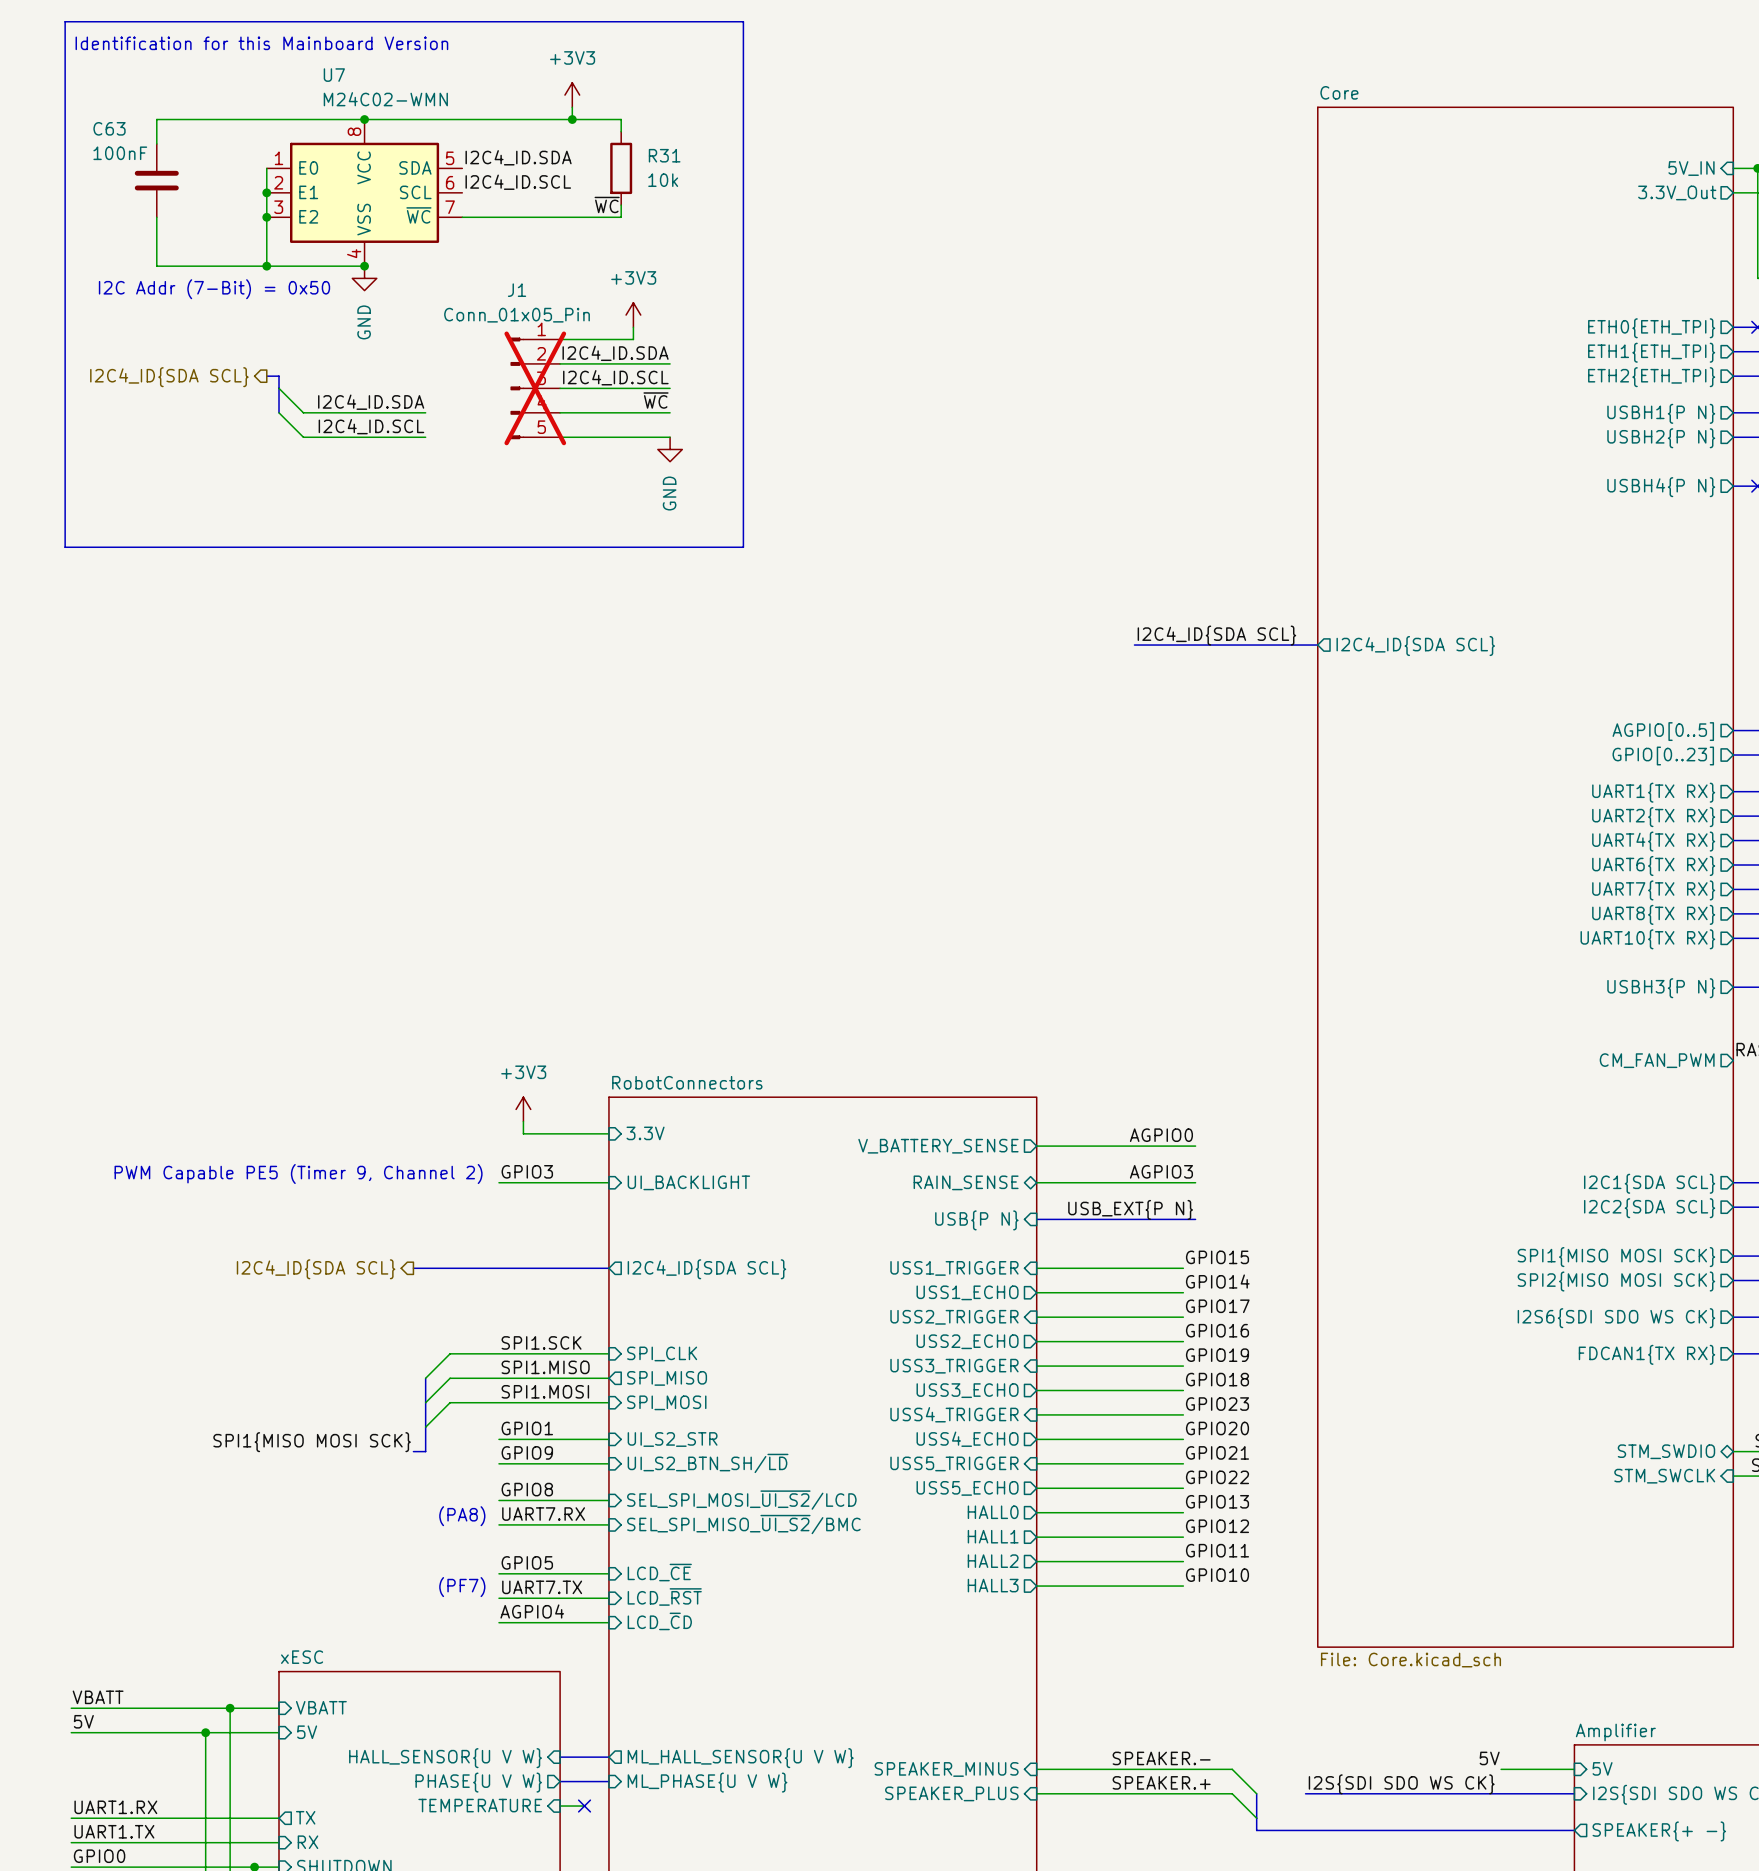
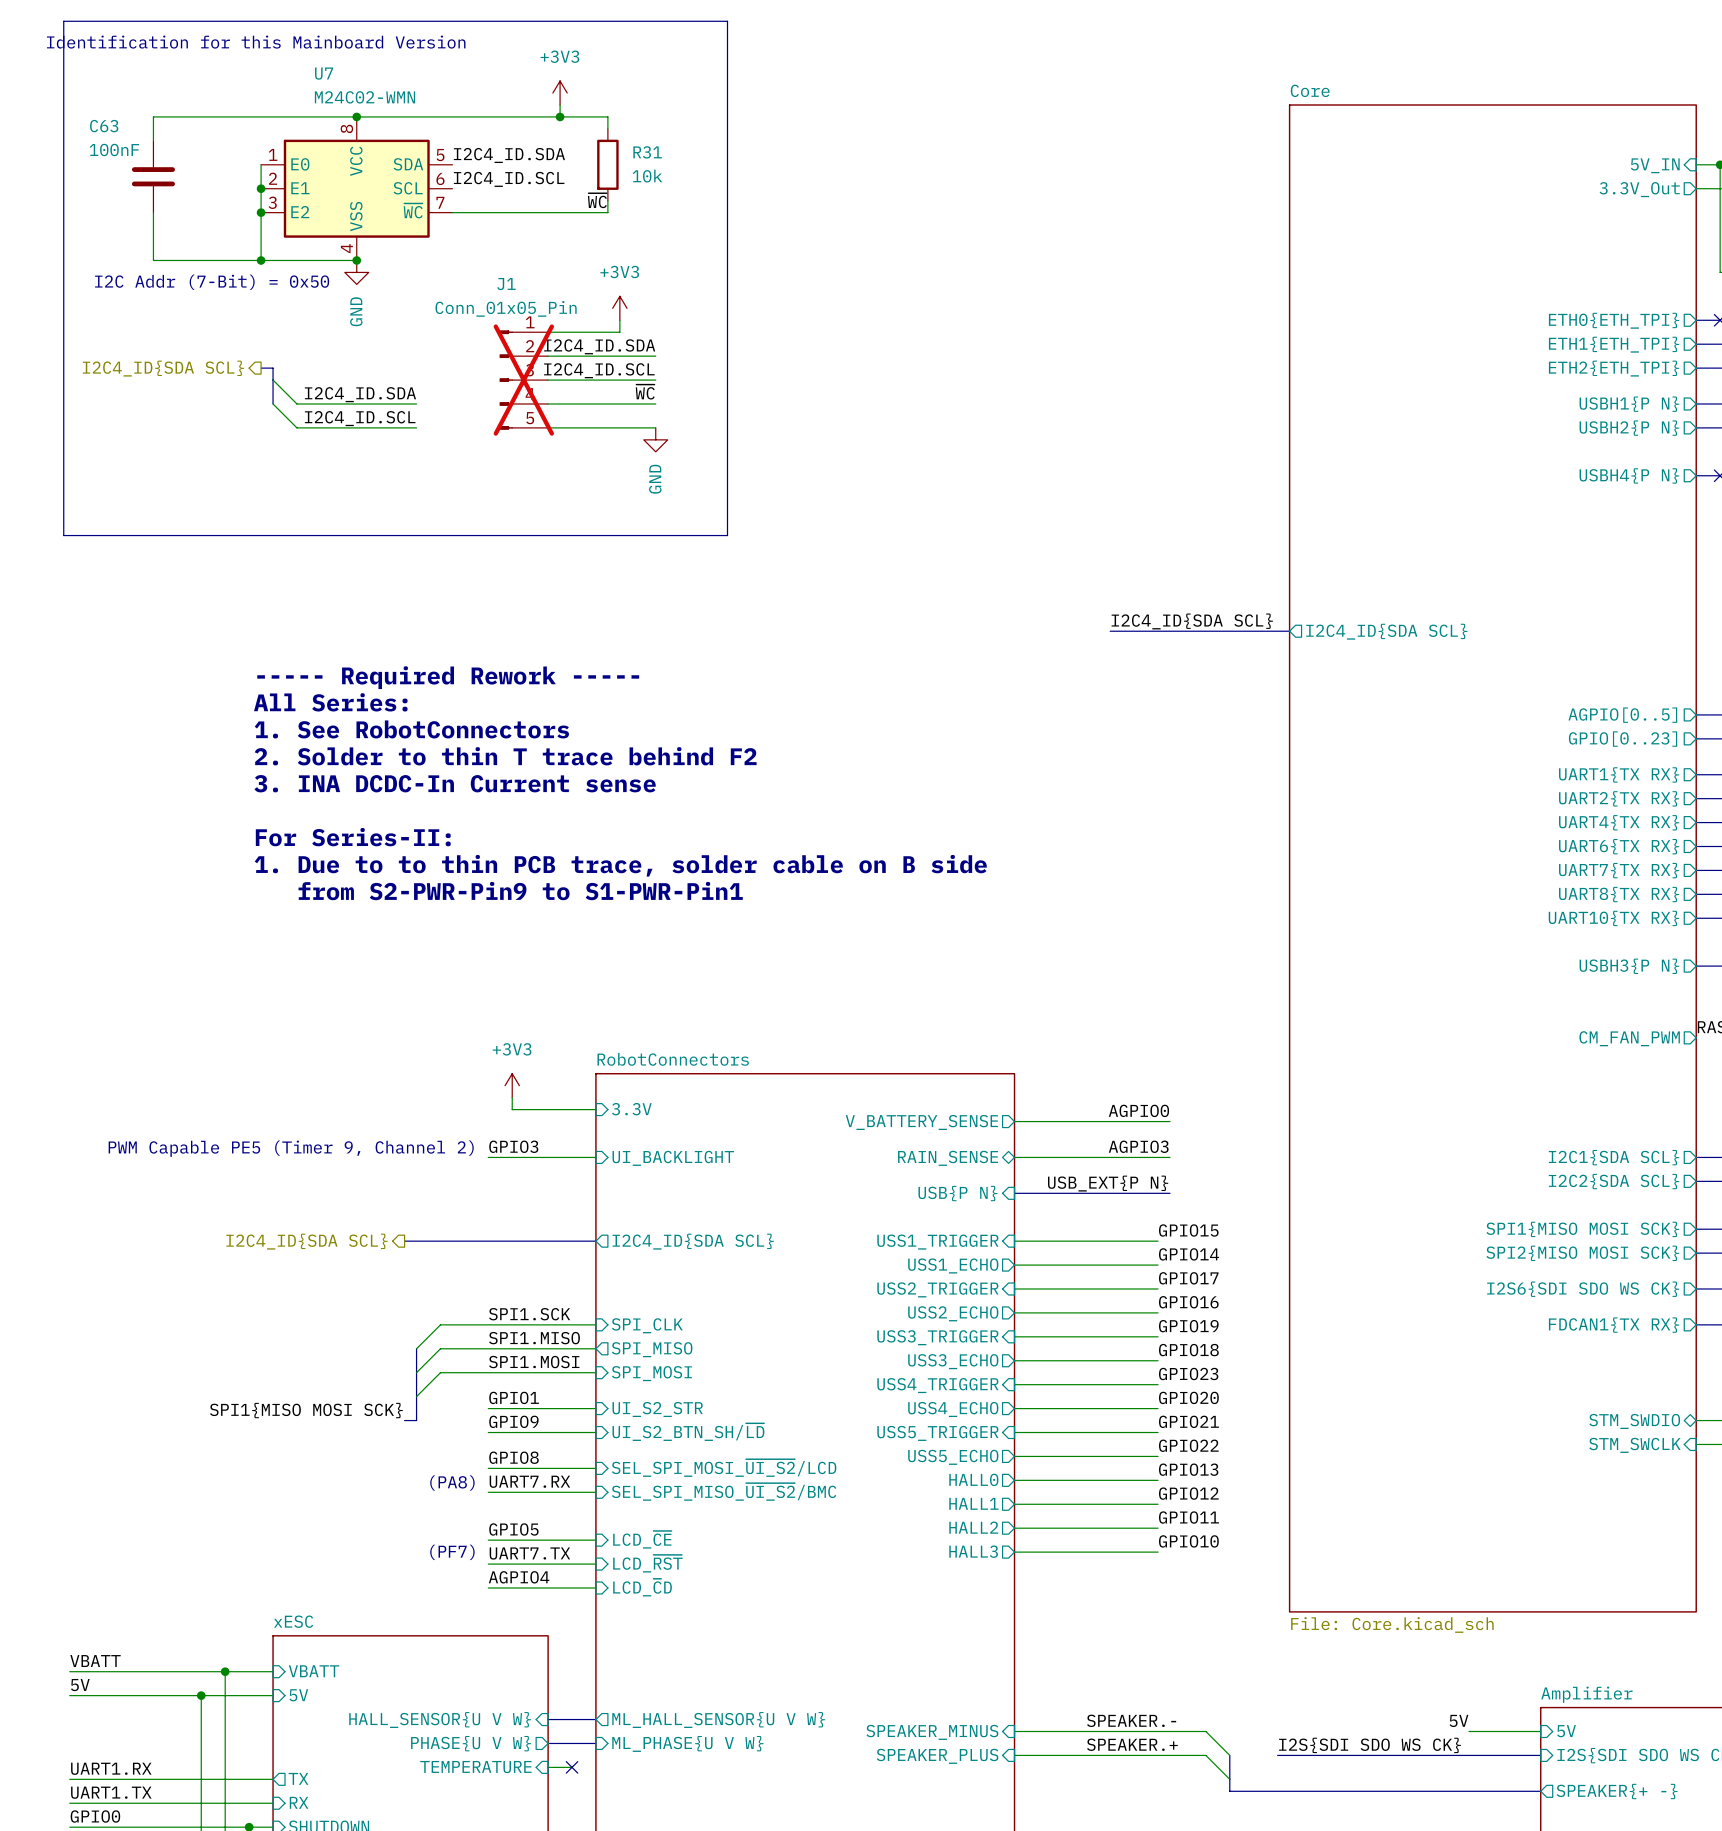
text: none -> ----- Required Rework ----- (448, 677)
text: none -> All Series: (330, 702)
text: none -> 1. See RobotConnectors (411, 729)
text: none -> 2. Solder to thin T trace behind F2 (505, 756)
text: none -> 3. INA DCDC-In Current sense (455, 783)
text: none -> For Series-II: (353, 837)
text: none -> 1. Due to to thin PCB trace, solder cable on B side (620, 865)
text: none -> from S2-PWR-Pin9 to S1-PWR-Pin1 (520, 891)

